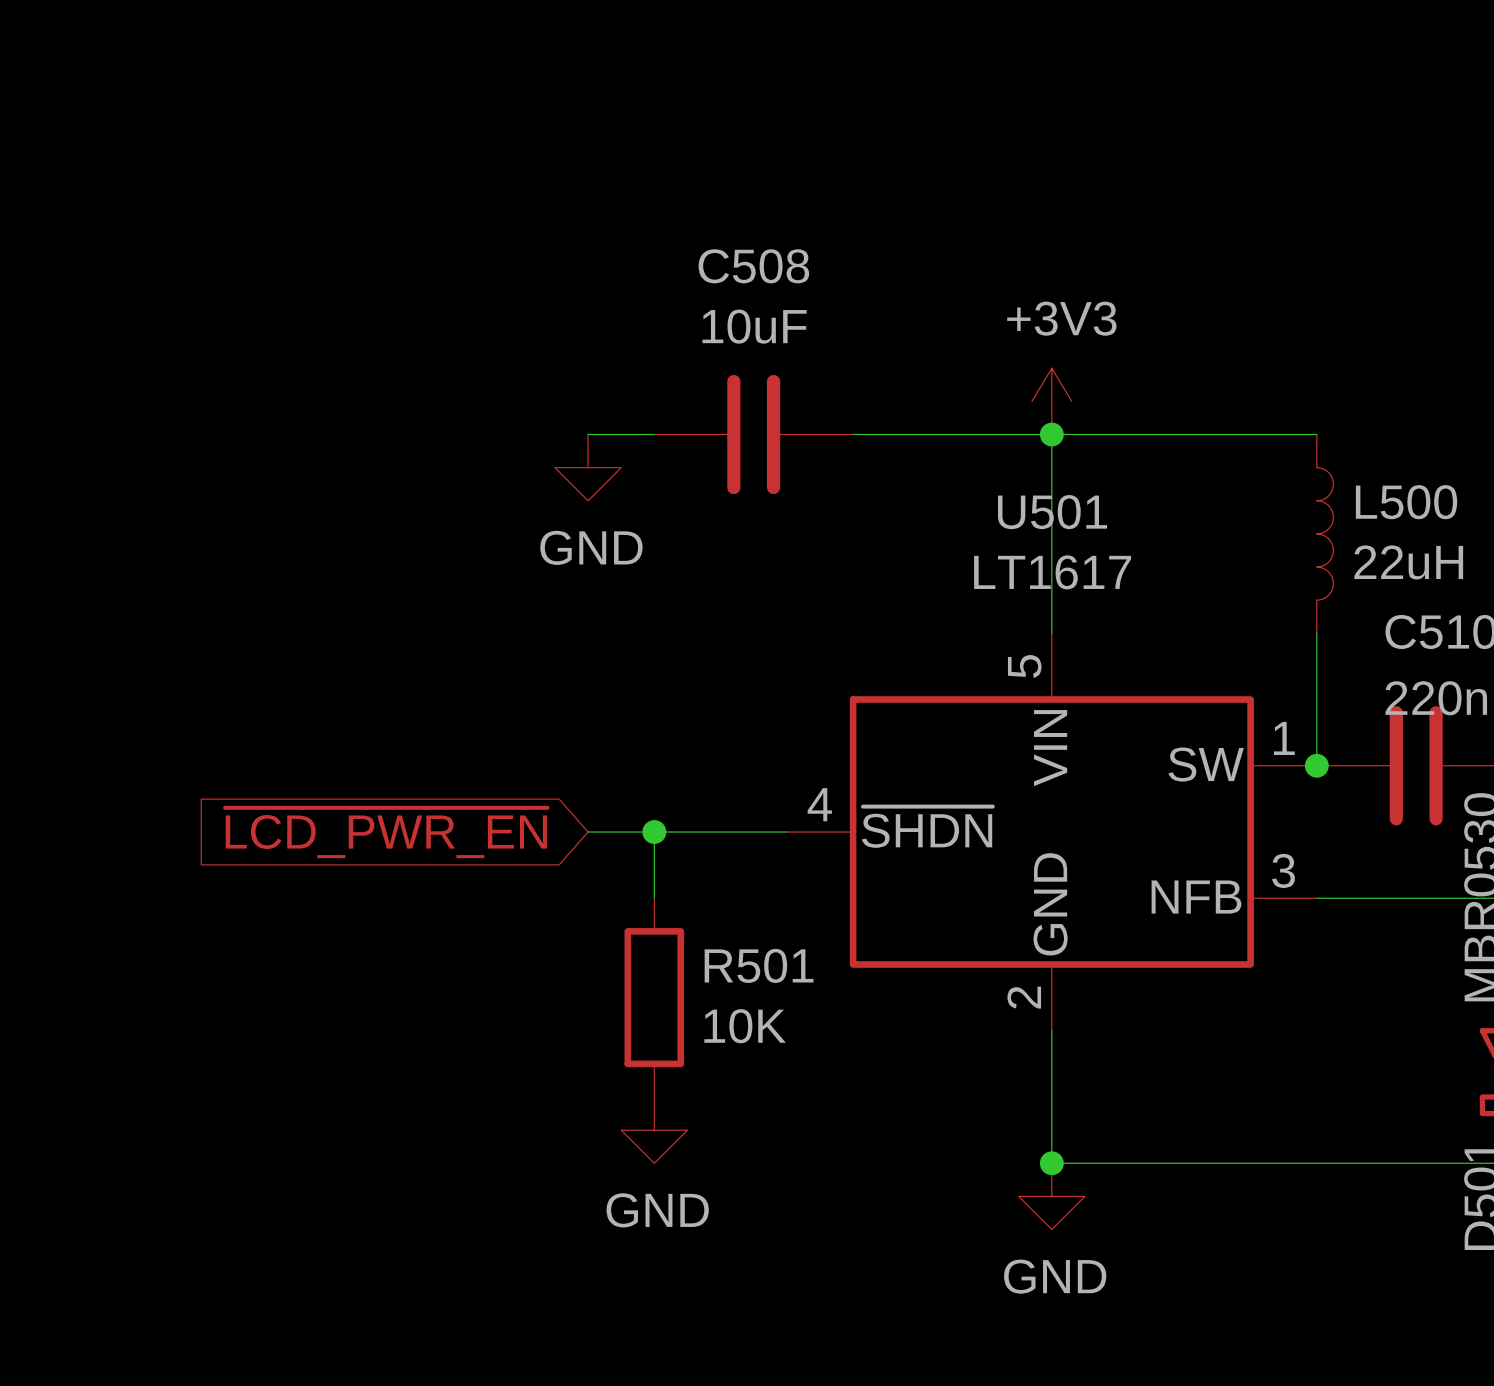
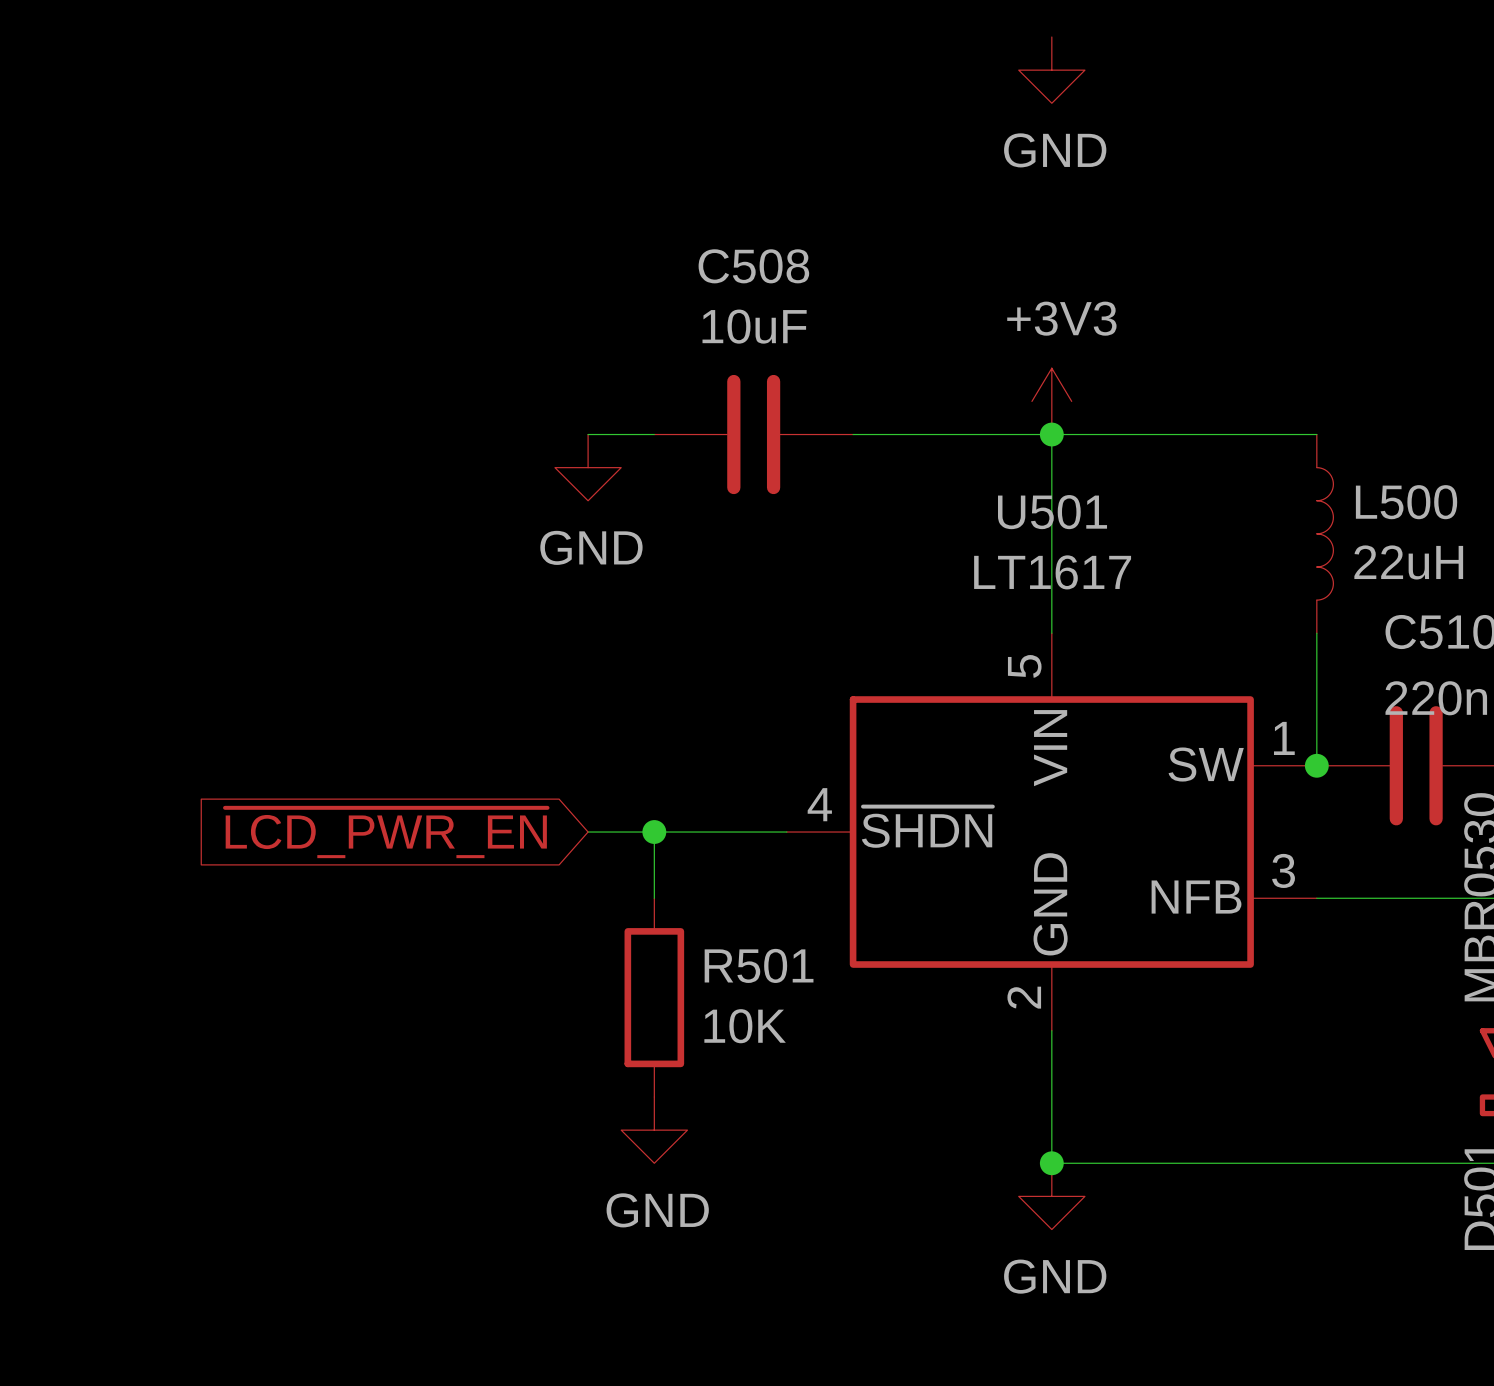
power symbol: none -> GND (1051, 70)

